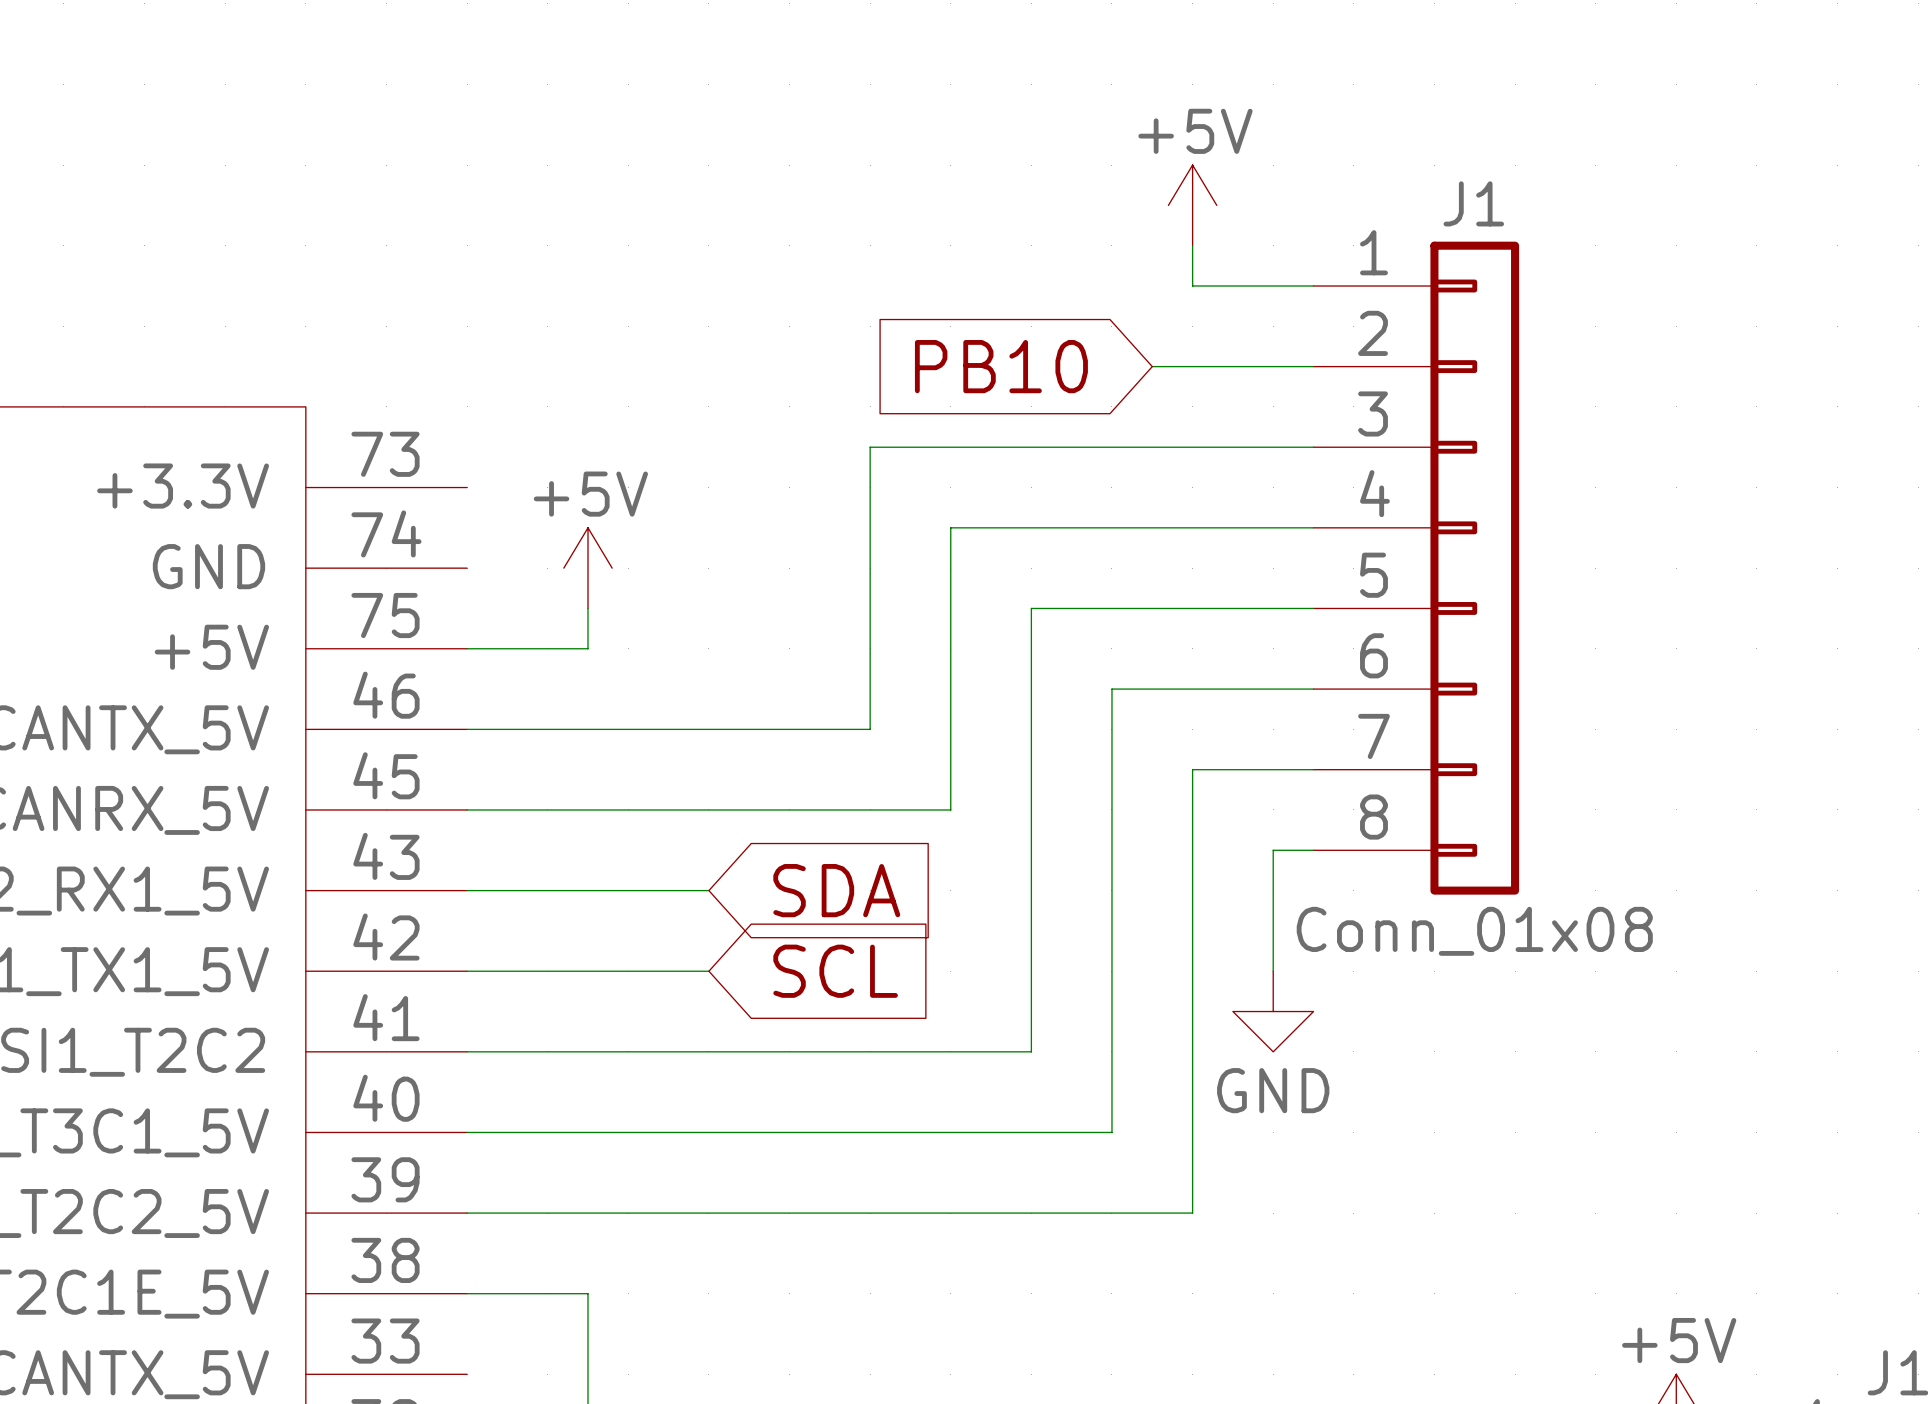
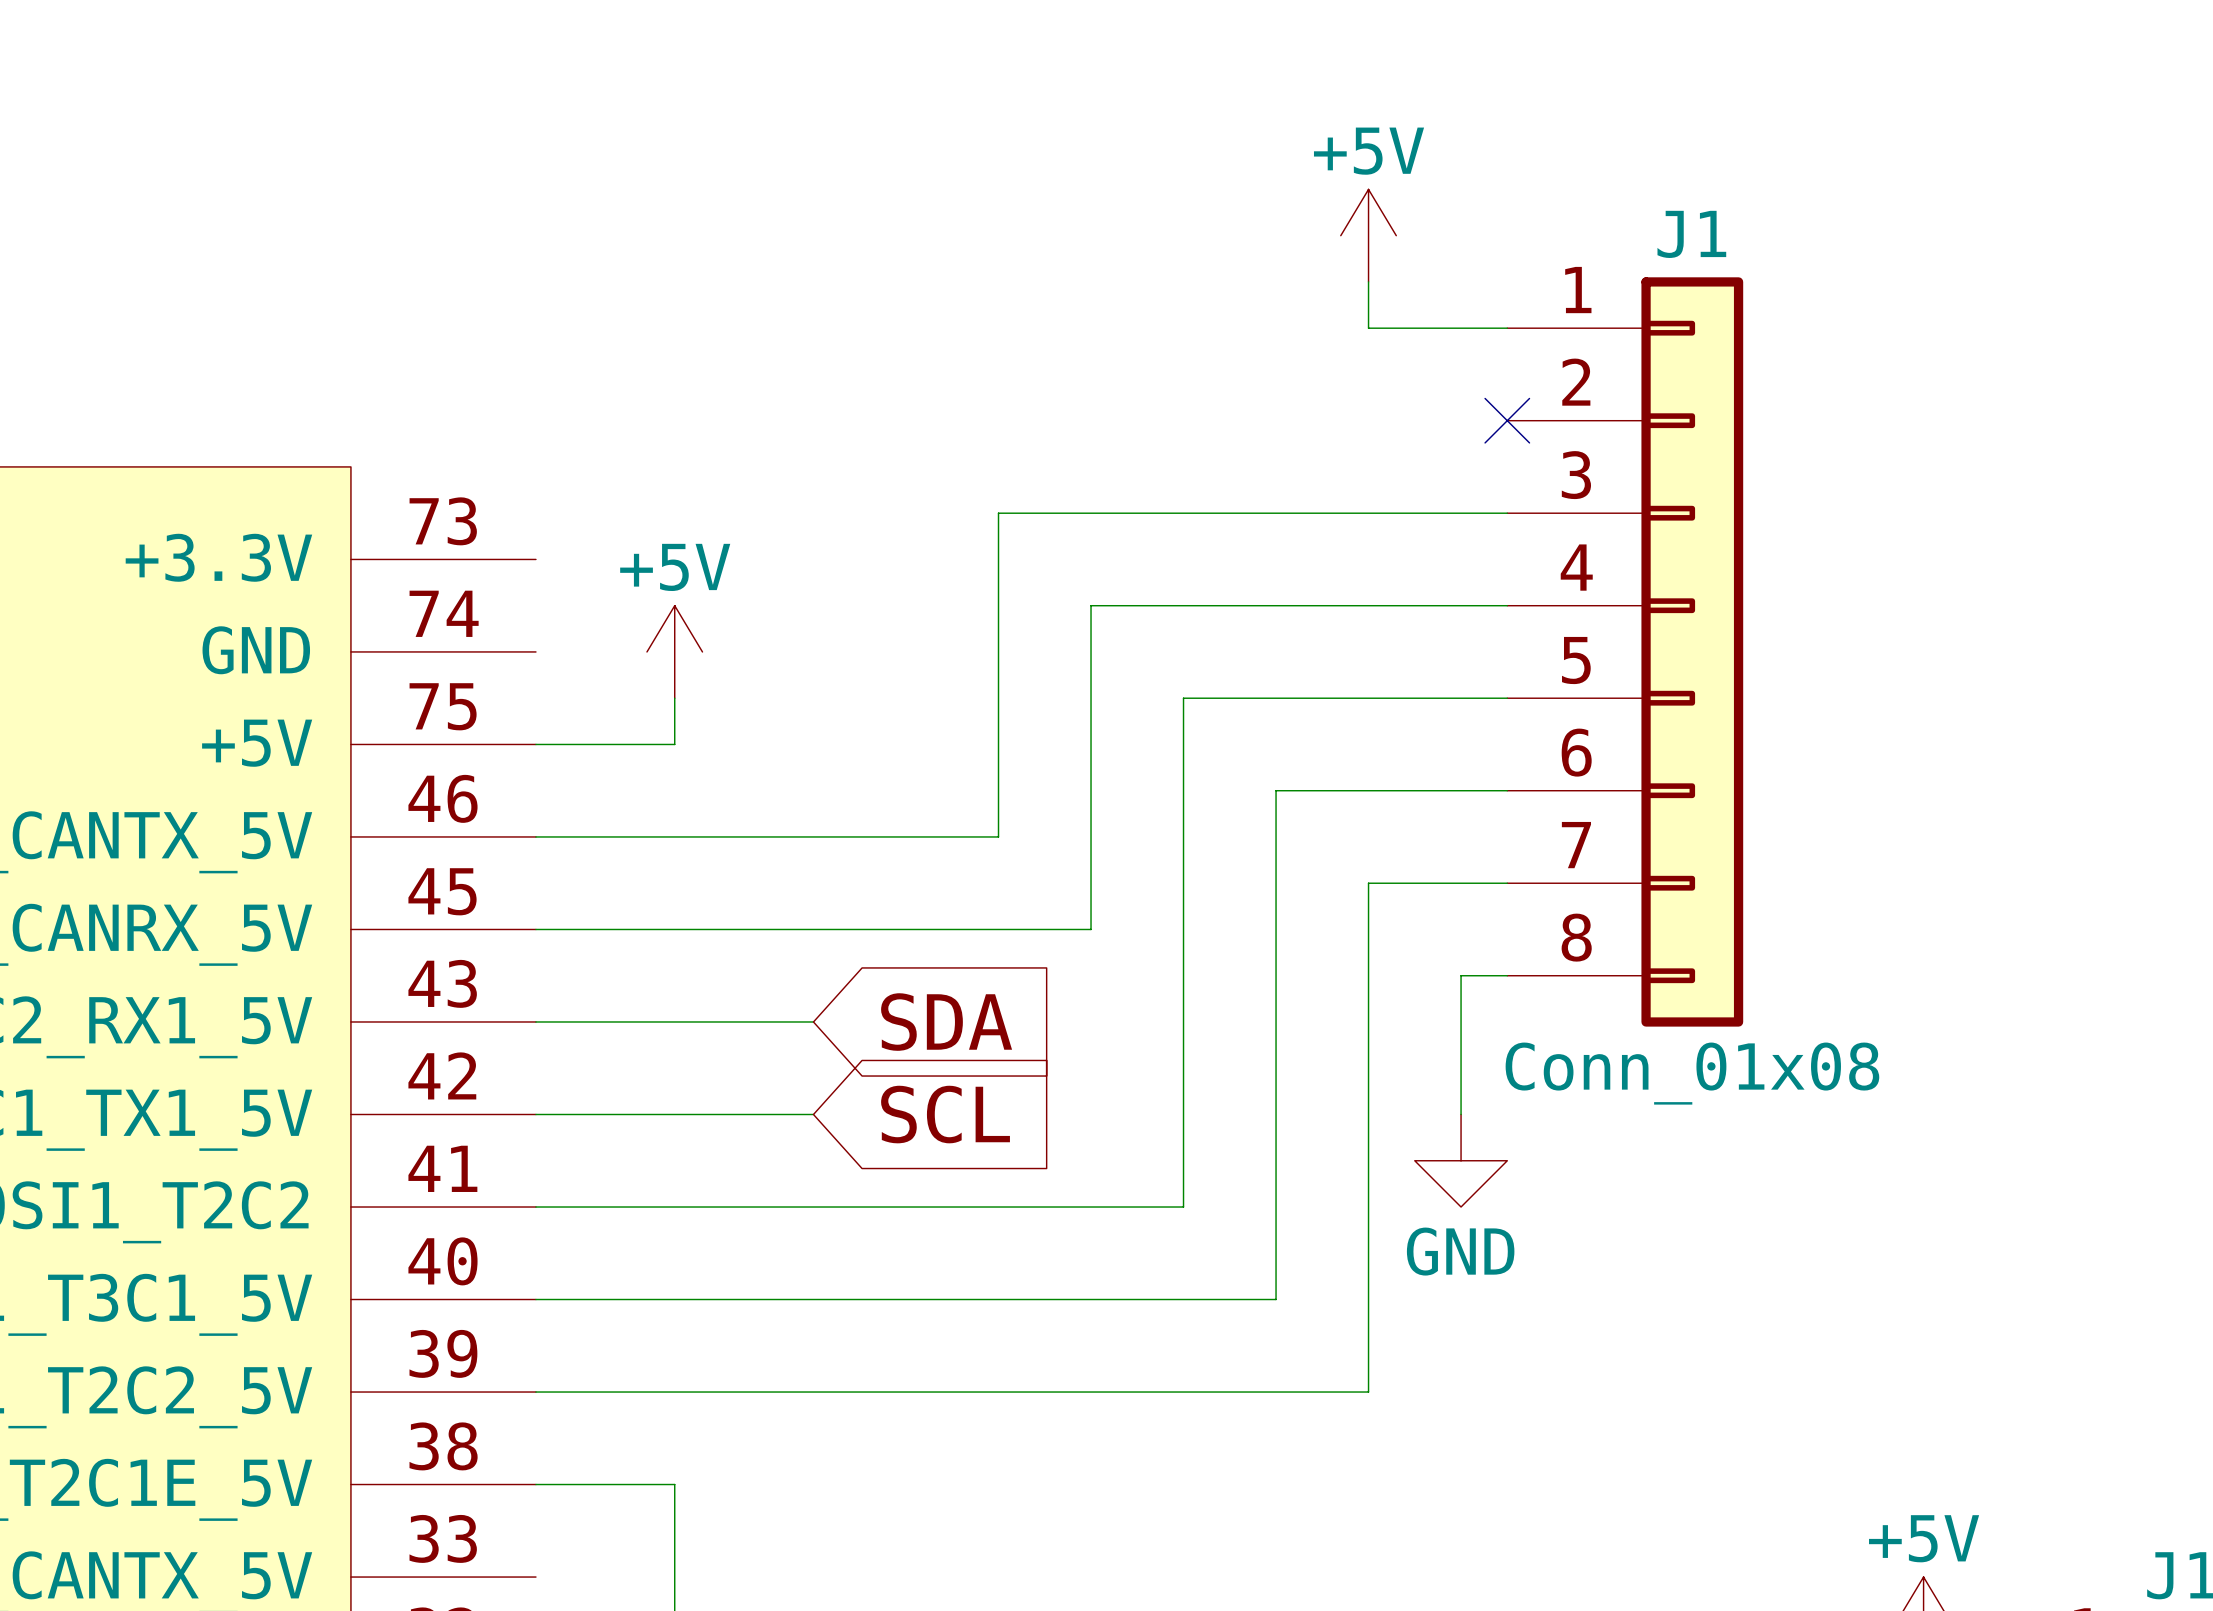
global label: PB10 (1001, 366) -> none
wire: (1152, 366) (1313, 366) -> none
no-connect mark: none -> (1507, 420)

